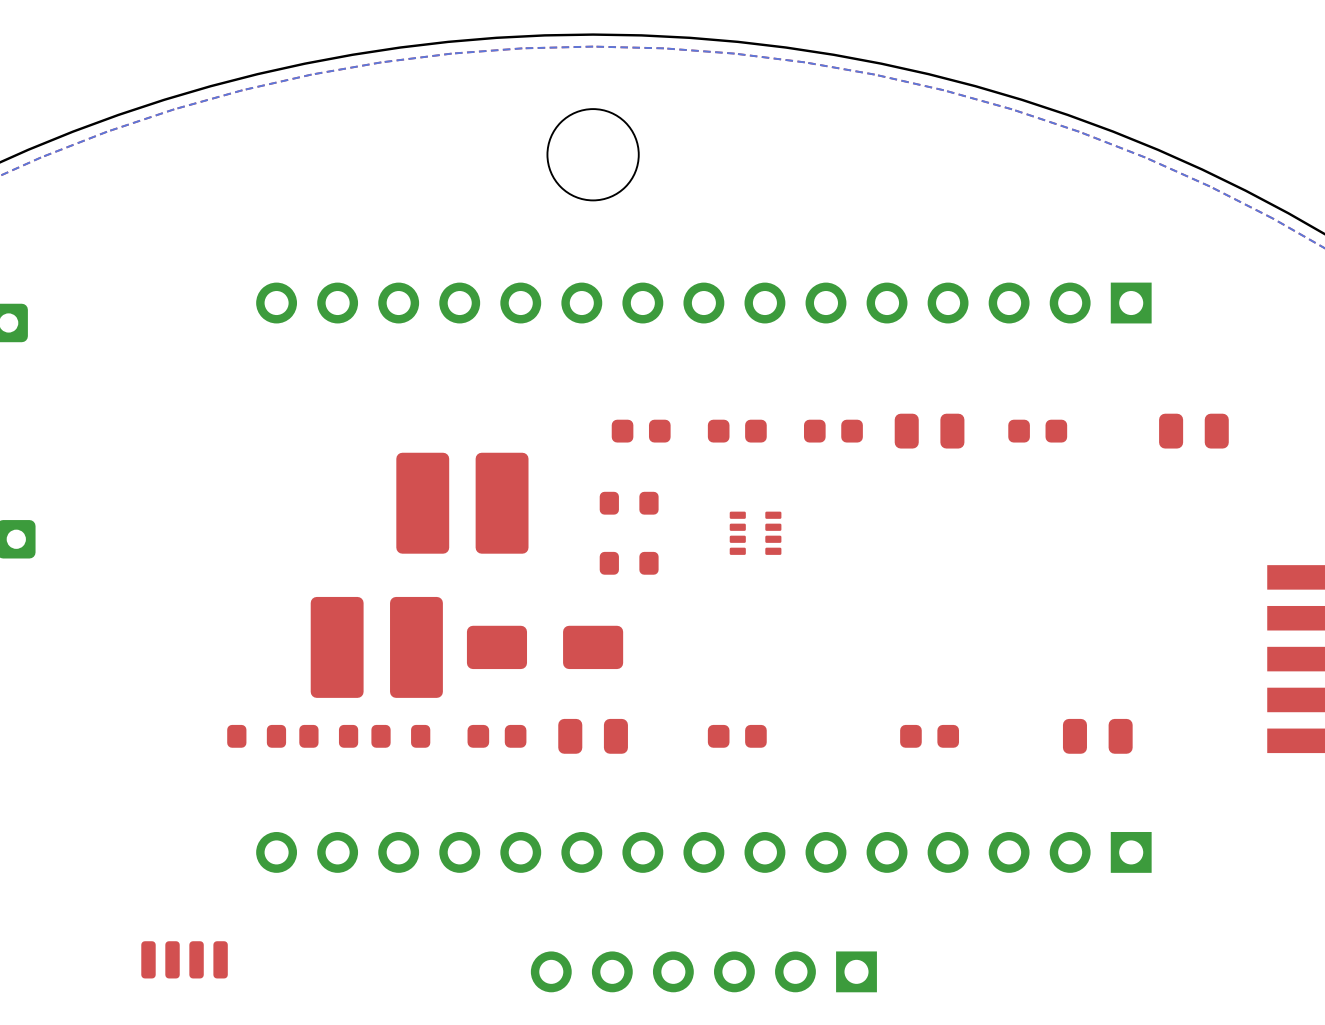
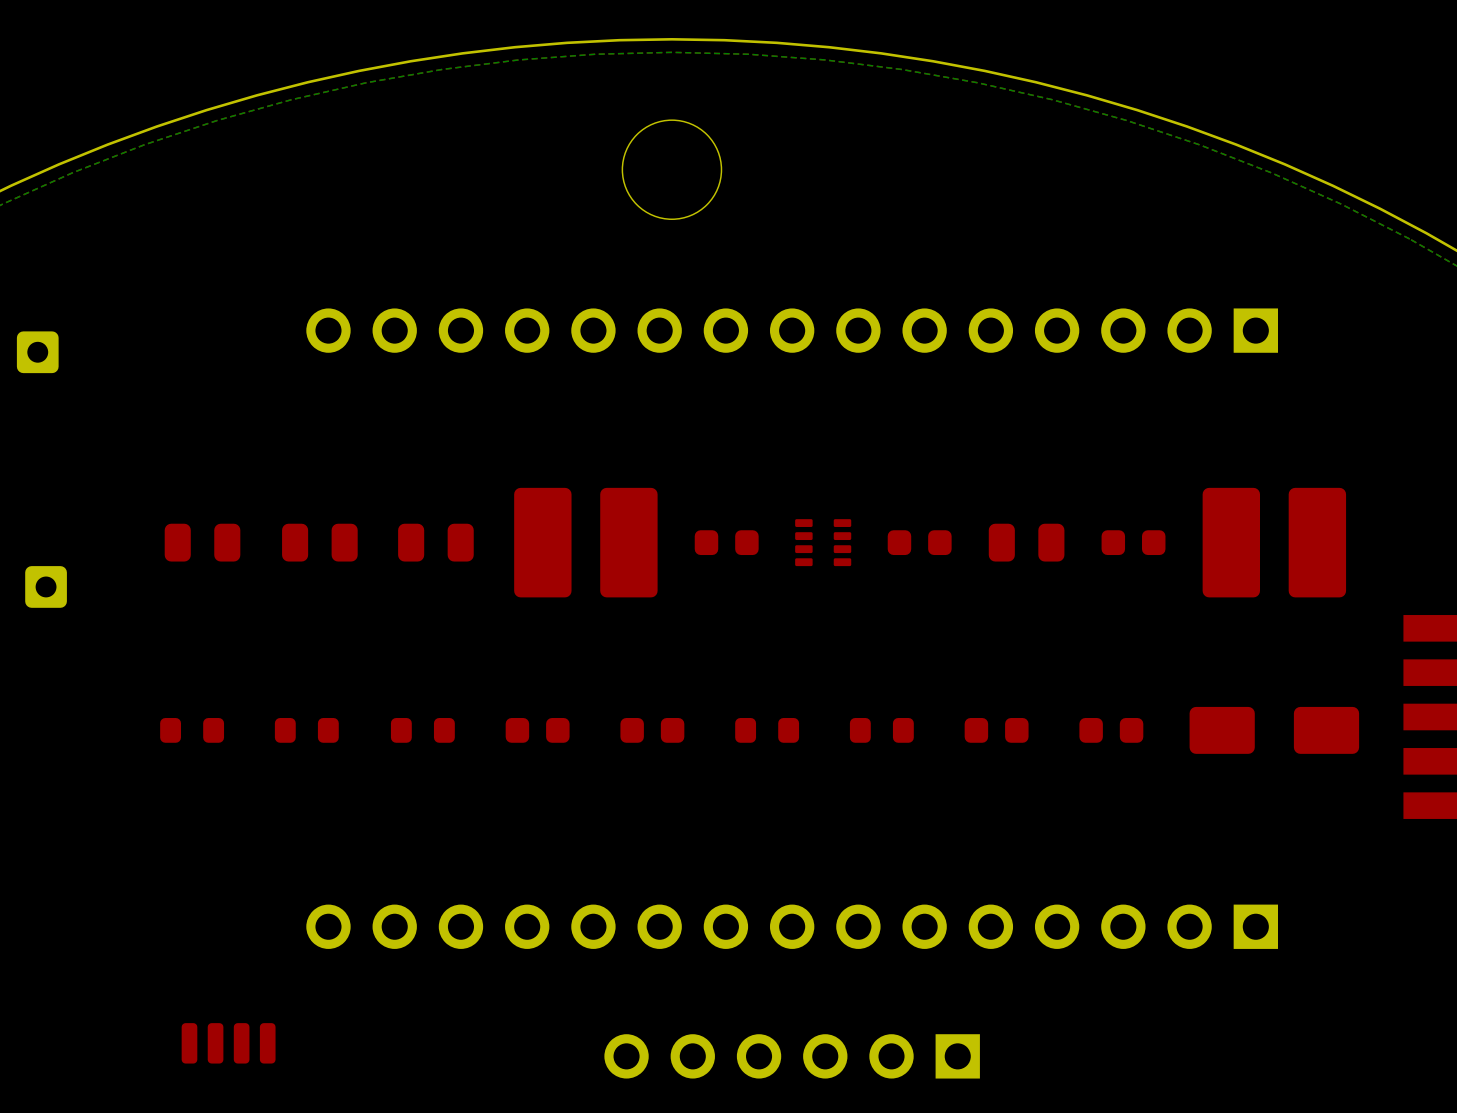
part: (641, 431) -> none
part: (737, 431) -> none
part: (833, 431) -> none
part position: (929, 431) -> (1026, 542)
part position: (1037, 431) -> (1133, 542)
part: (1193, 431) -> none
part footprint: [599, 491, 659, 515] -> [694, 530, 759, 556]
part: none -> (202, 542)
part: none -> (319, 542)
part: none -> (435, 542)
part: none -> (919, 542)
part: none -> (1274, 542)
part position: (462, 503) -> (585, 542)
part position: (755, 533) -> (823, 542)
part: (629, 563) -> none
part: (376, 647) -> none
part: (545, 647) -> none
part: none -> (192, 730)
part: none -> (306, 730)
part: none -> (422, 730)
part: none -> (537, 730)
part: none -> (652, 730)
part: none -> (767, 730)
part: none -> (881, 730)
part: none -> (996, 730)
part: none -> (1111, 730)
part: none -> (1274, 730)
part: (256, 736) -> none
part: (328, 736) -> none
part: (400, 736) -> none
part: (496, 736) -> none
part: (593, 736) -> none
part: (737, 736) -> none
part: (929, 736) -> none
part: (1097, 736) -> none

